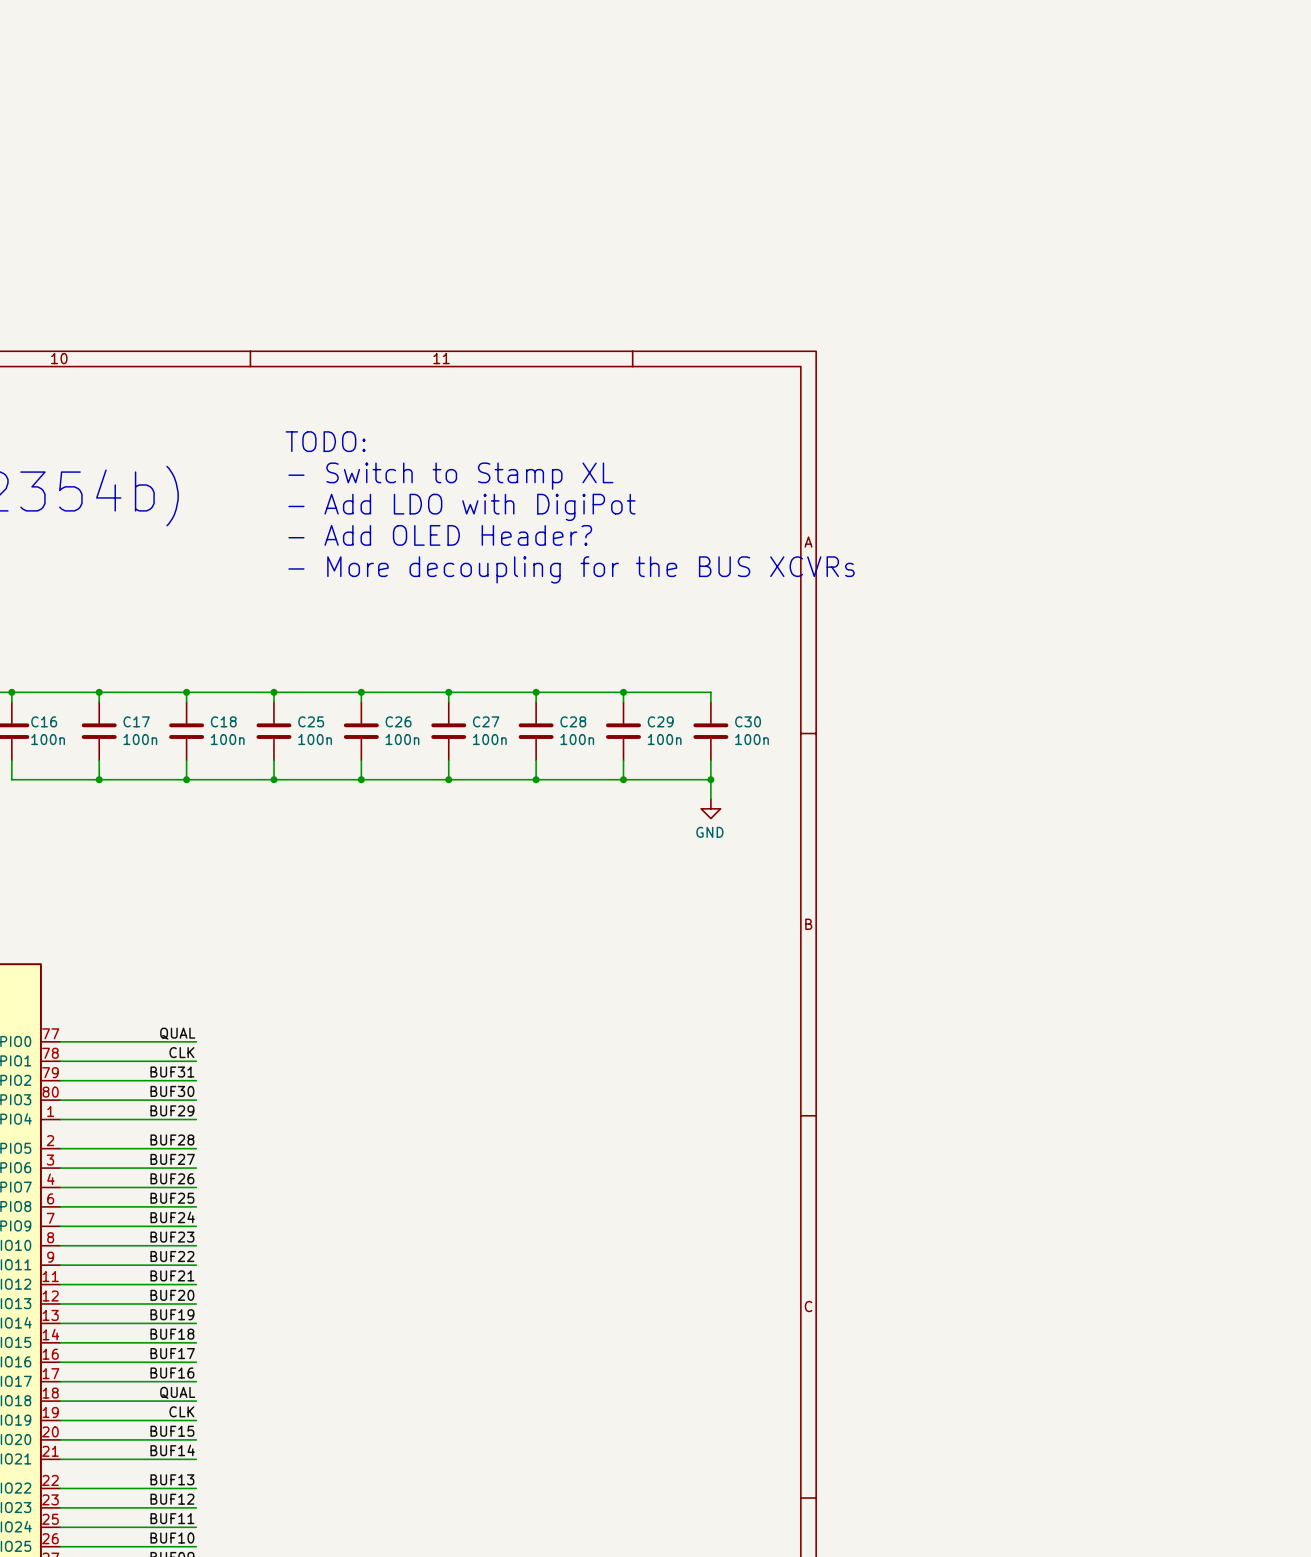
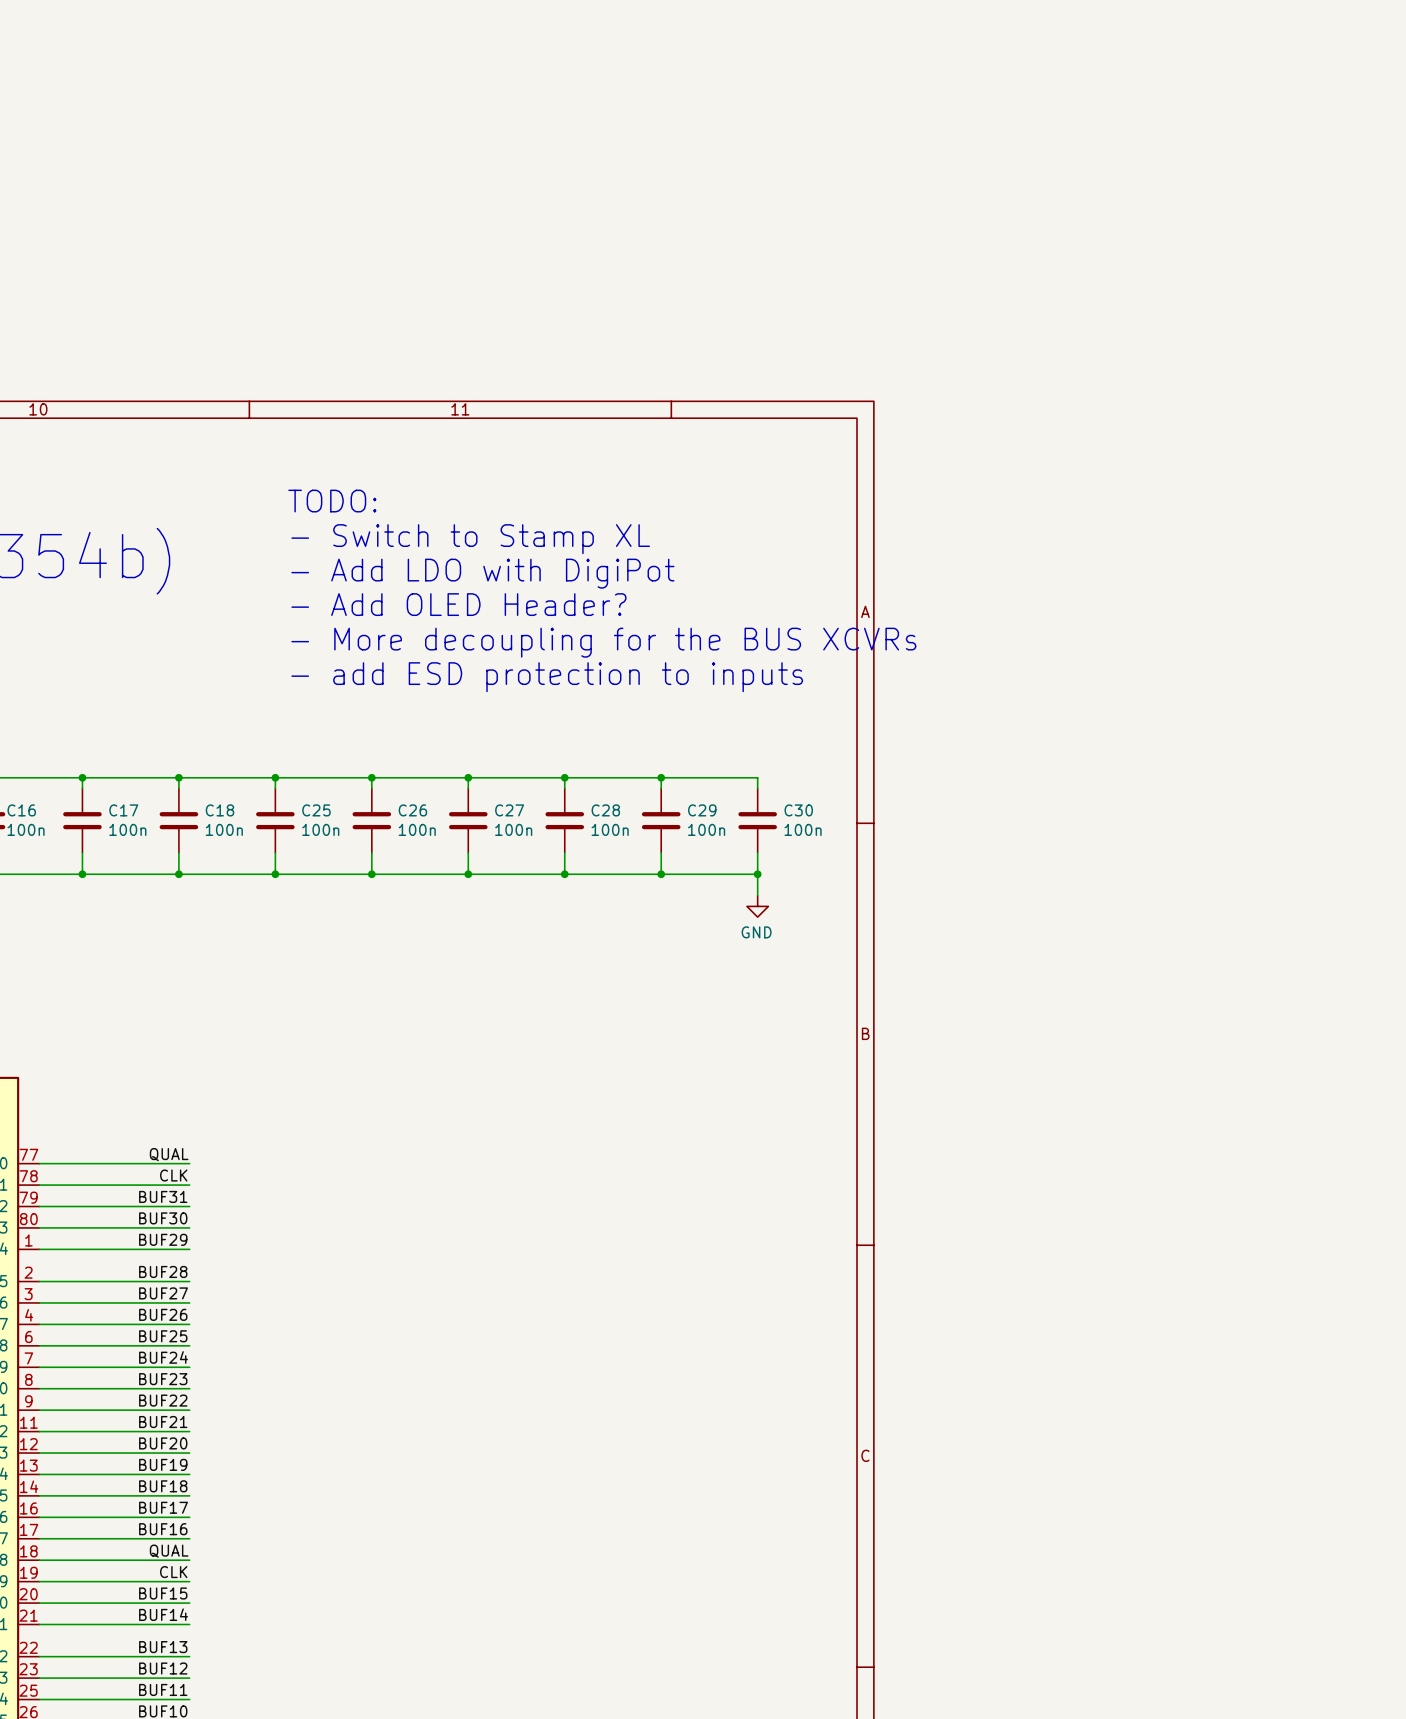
text: none -> - add ESD protection to inputs (547, 677)

